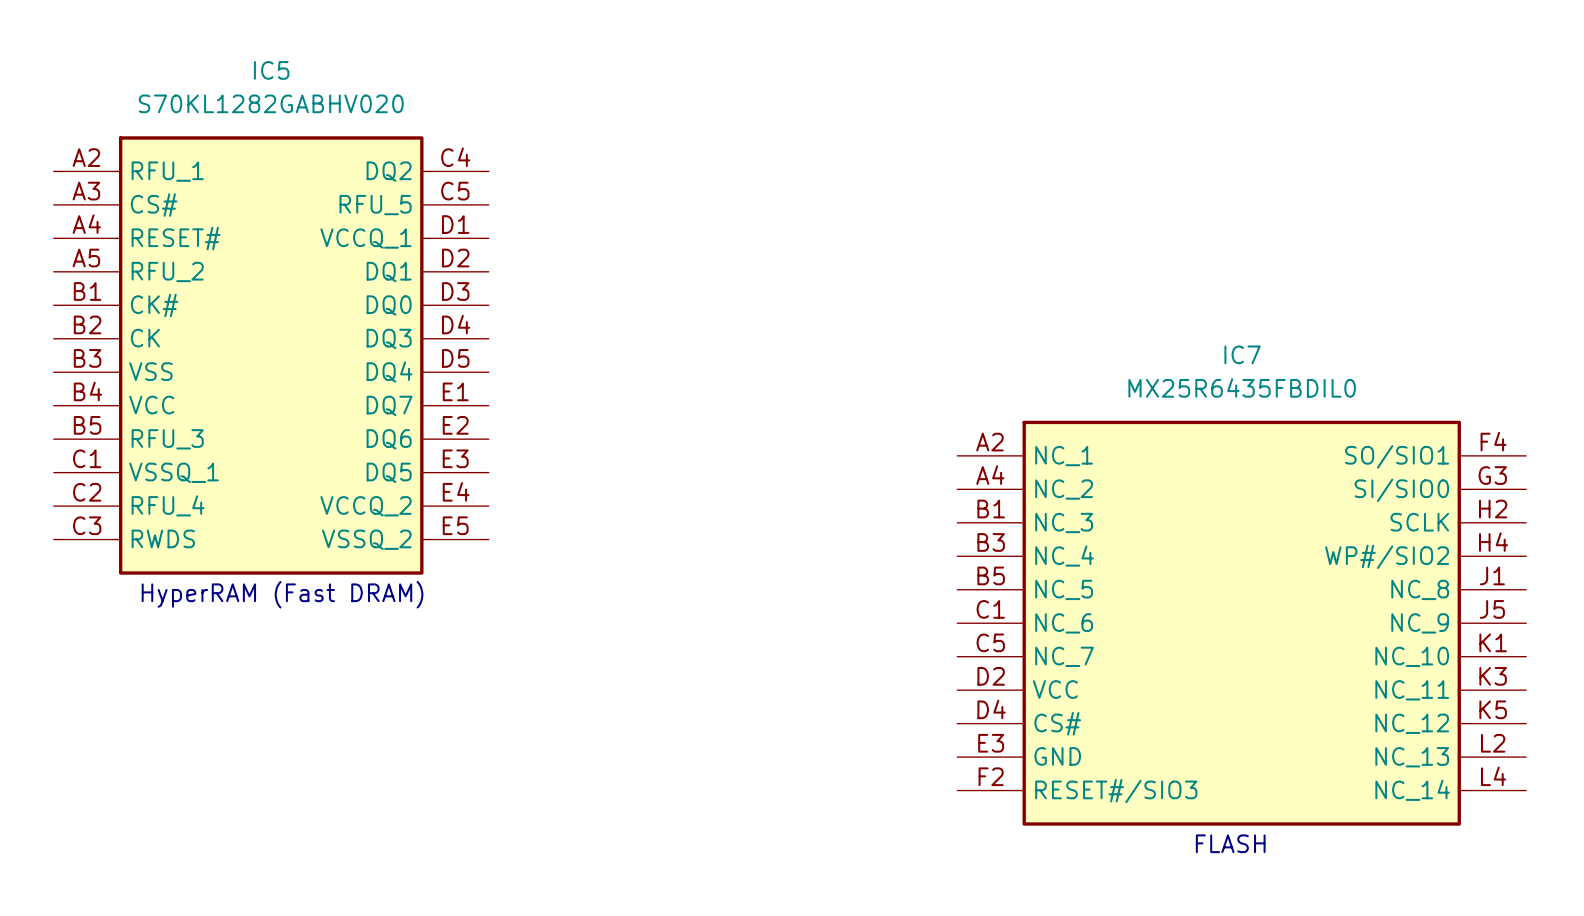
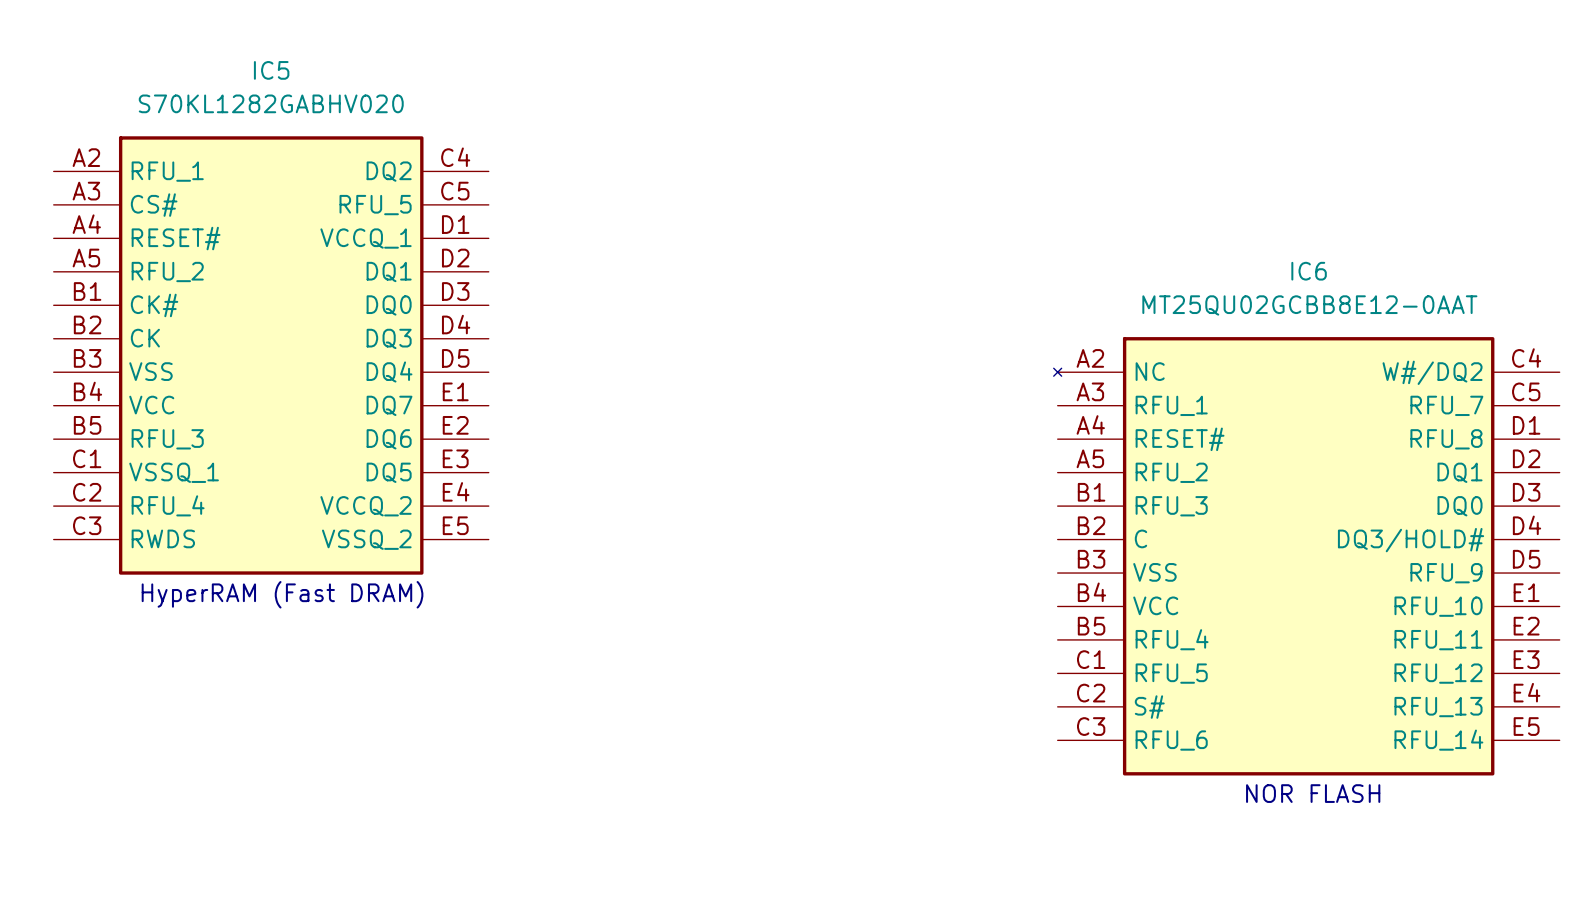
IC6: none -> MT25QU02GCBB8E12-0AAT (1306, 556)
IC7: MX25R6435FBDIL0 (1241, 623) -> none
text: none -> NOR FLASH (1313, 793)
text: FLASH (1230, 843) -> none

